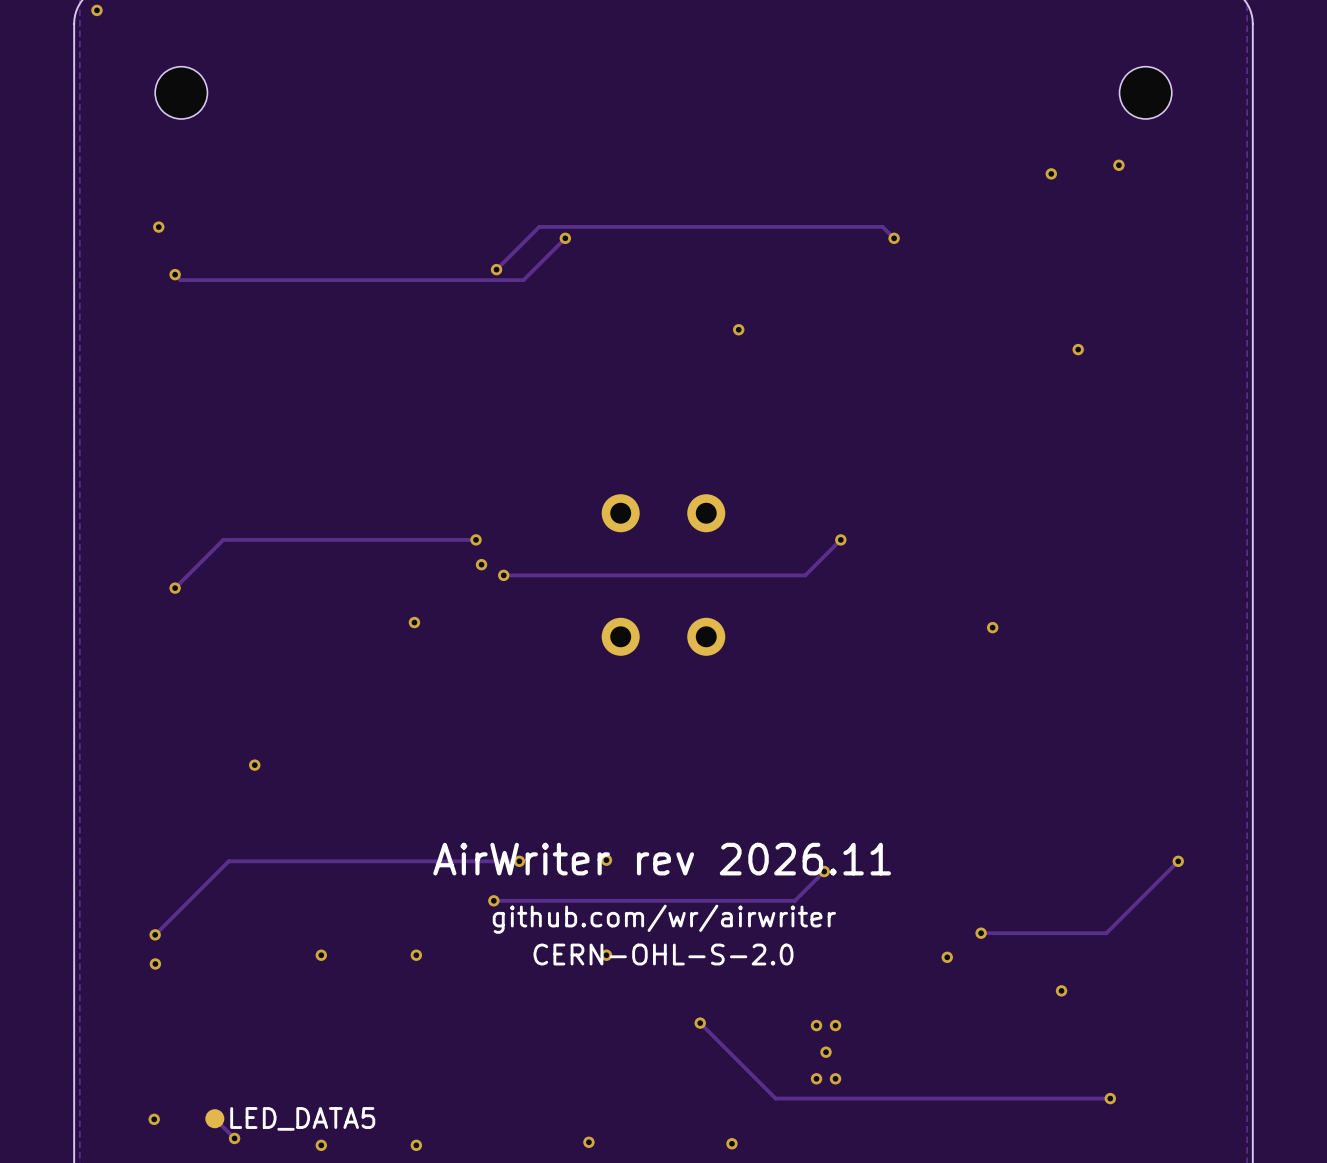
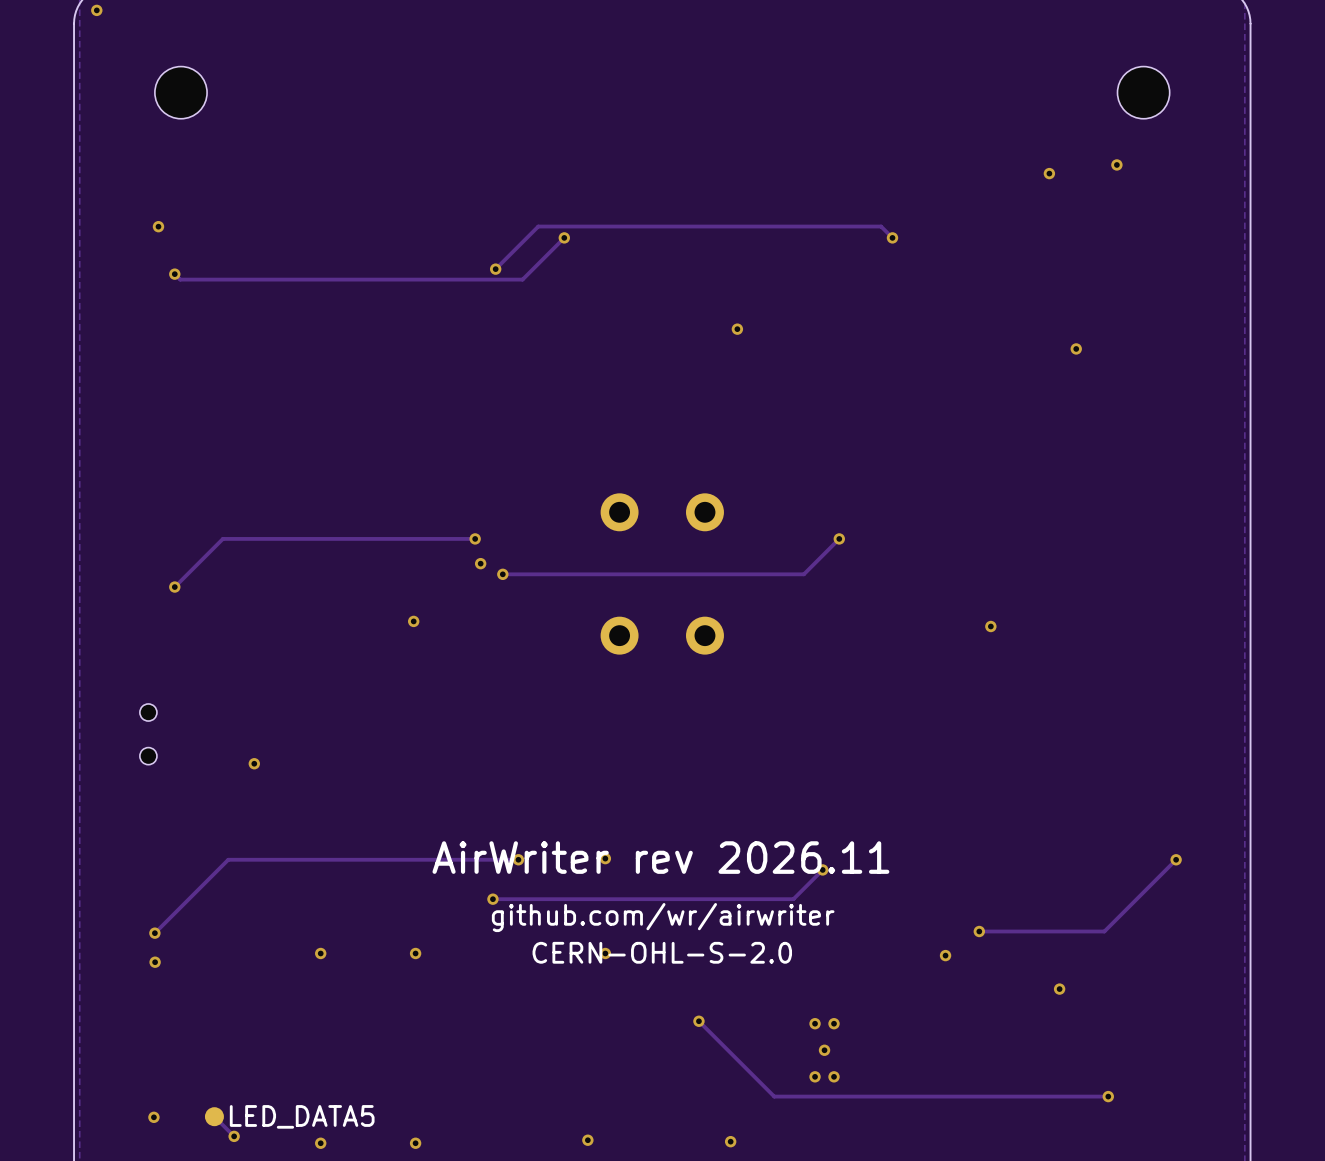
part: none -> (148, 734)

